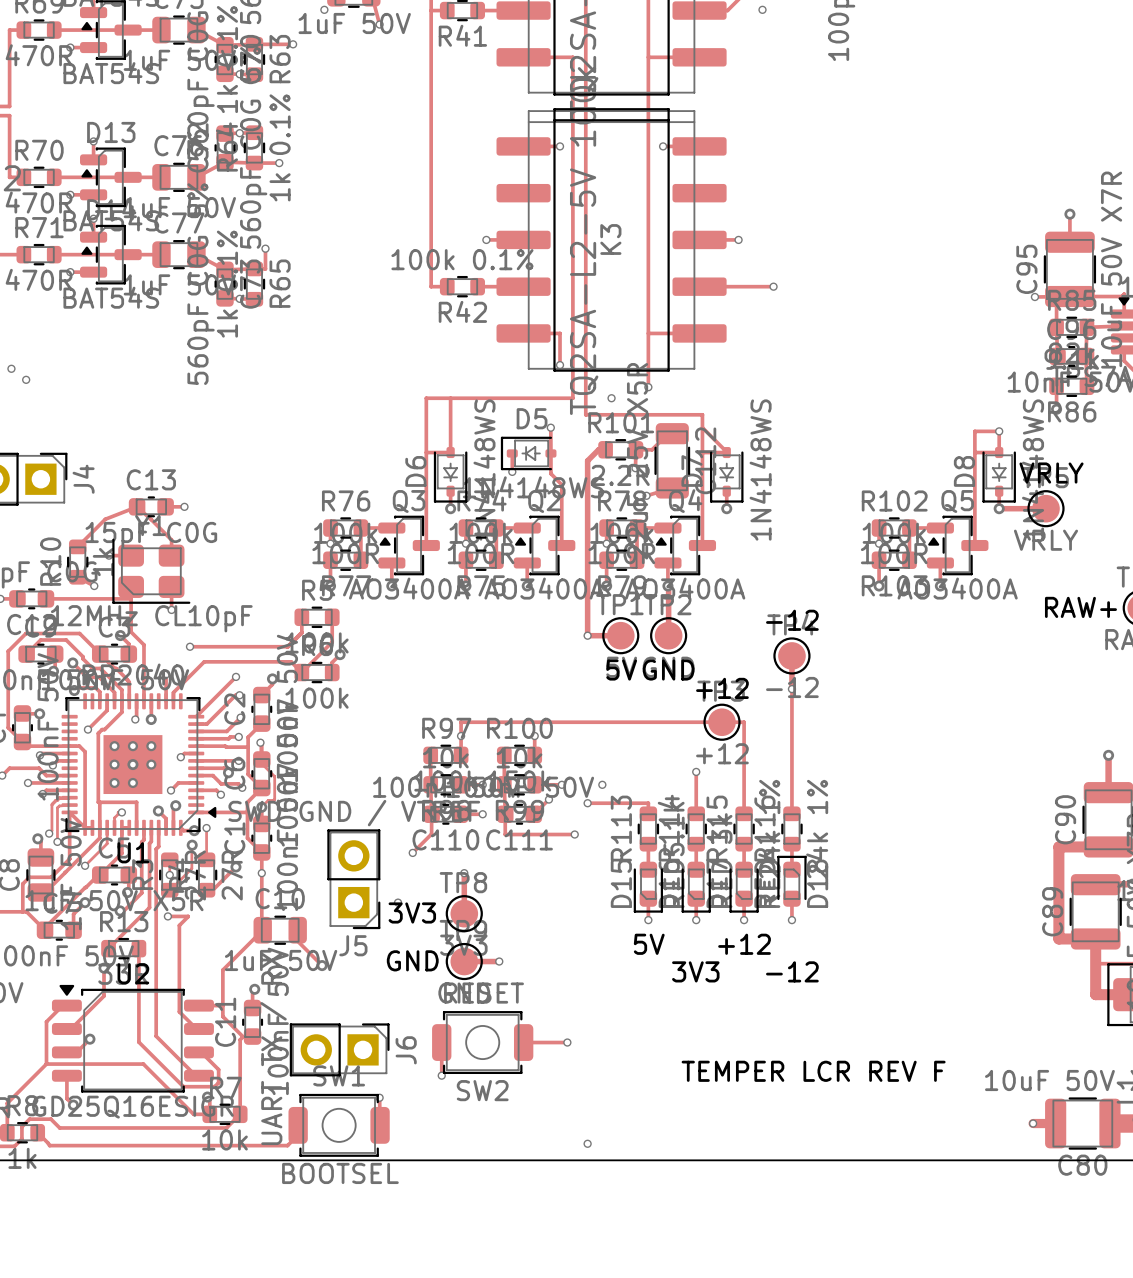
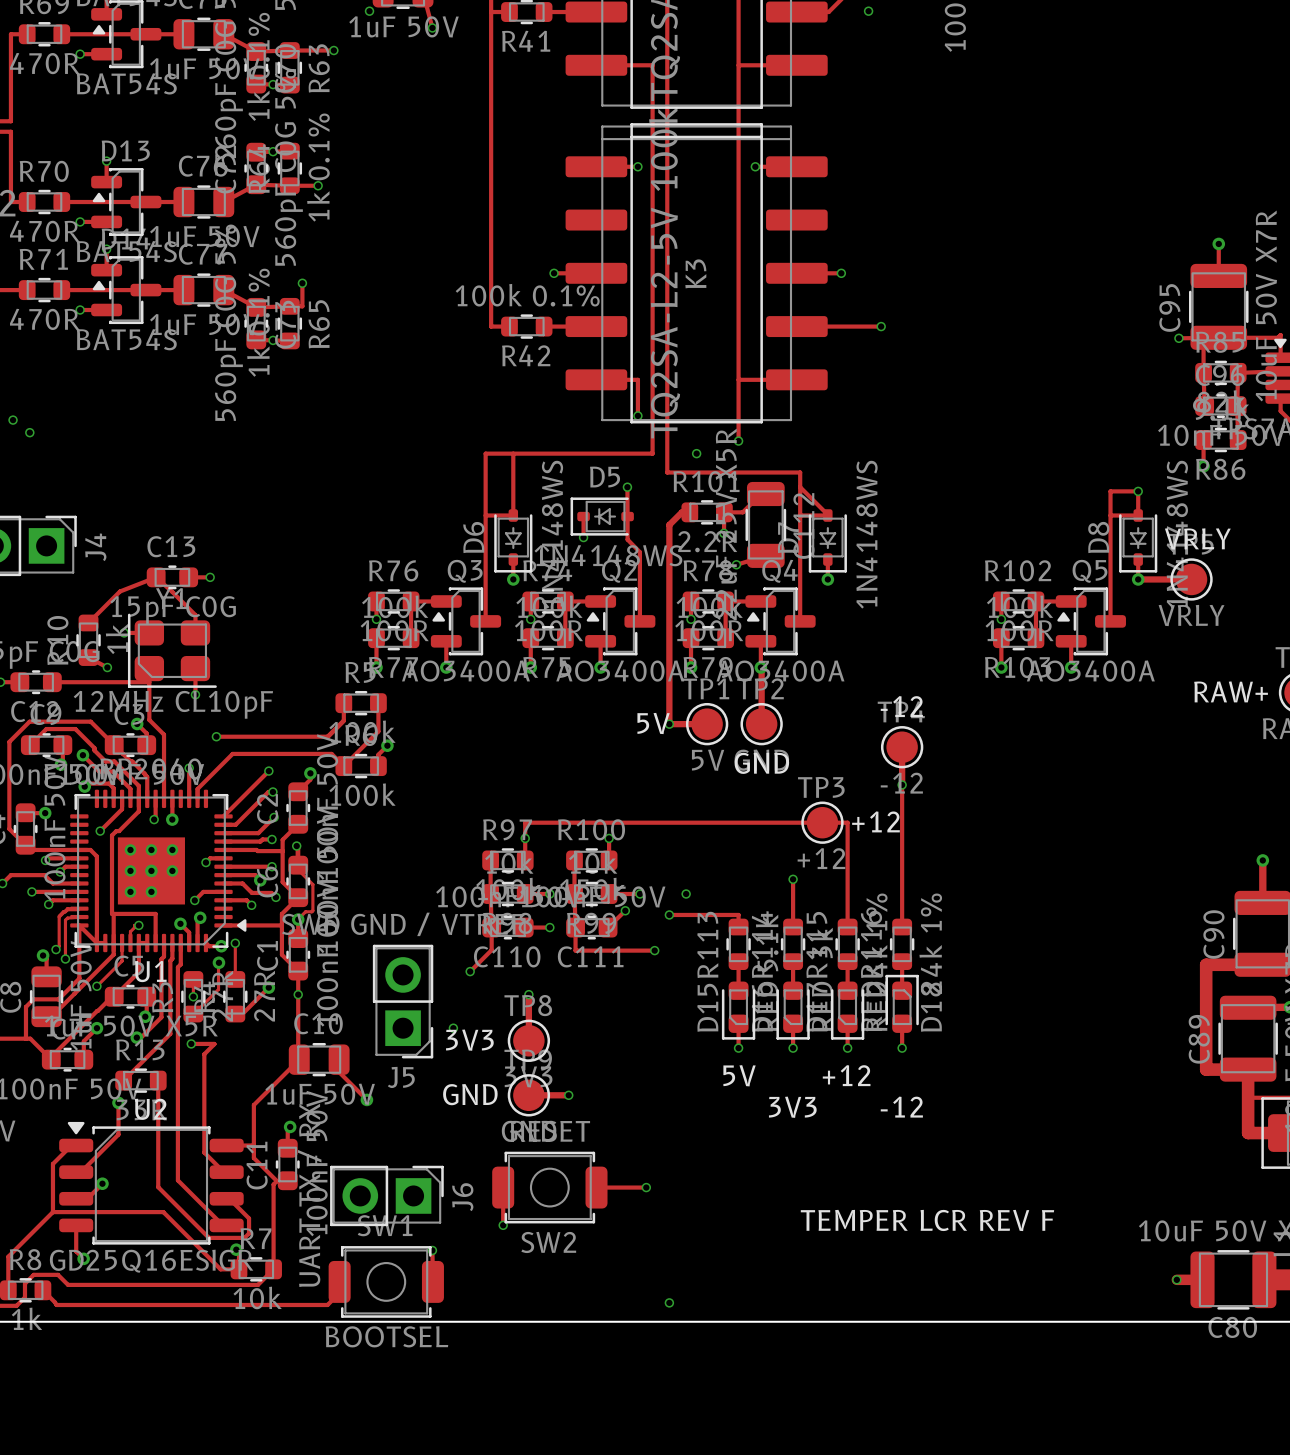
text position: 5V (621, 669) -> 5V (653, 723)
text position: +12 (722, 688) -> +12 (875, 821)

